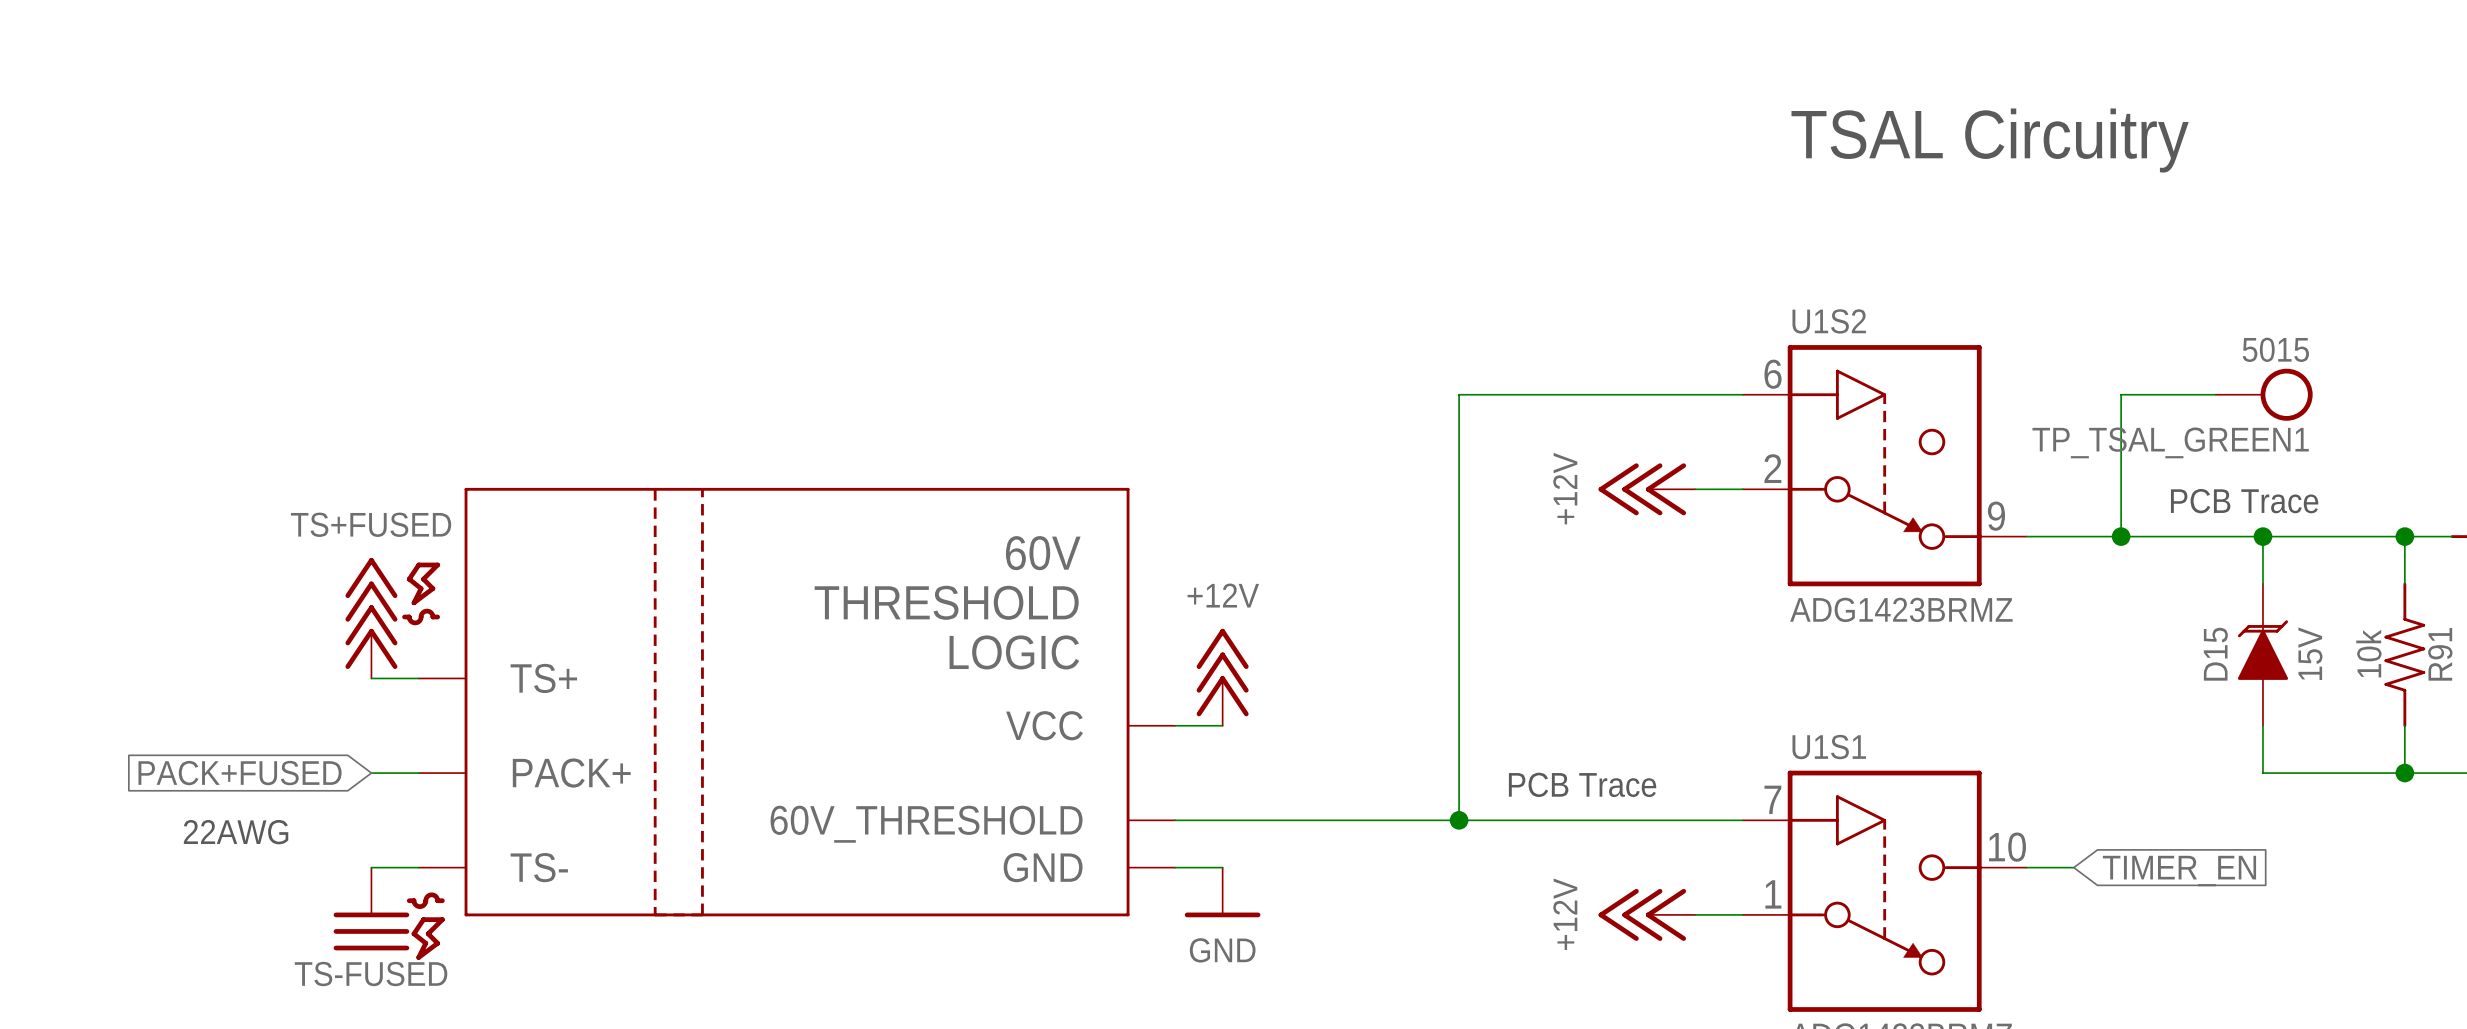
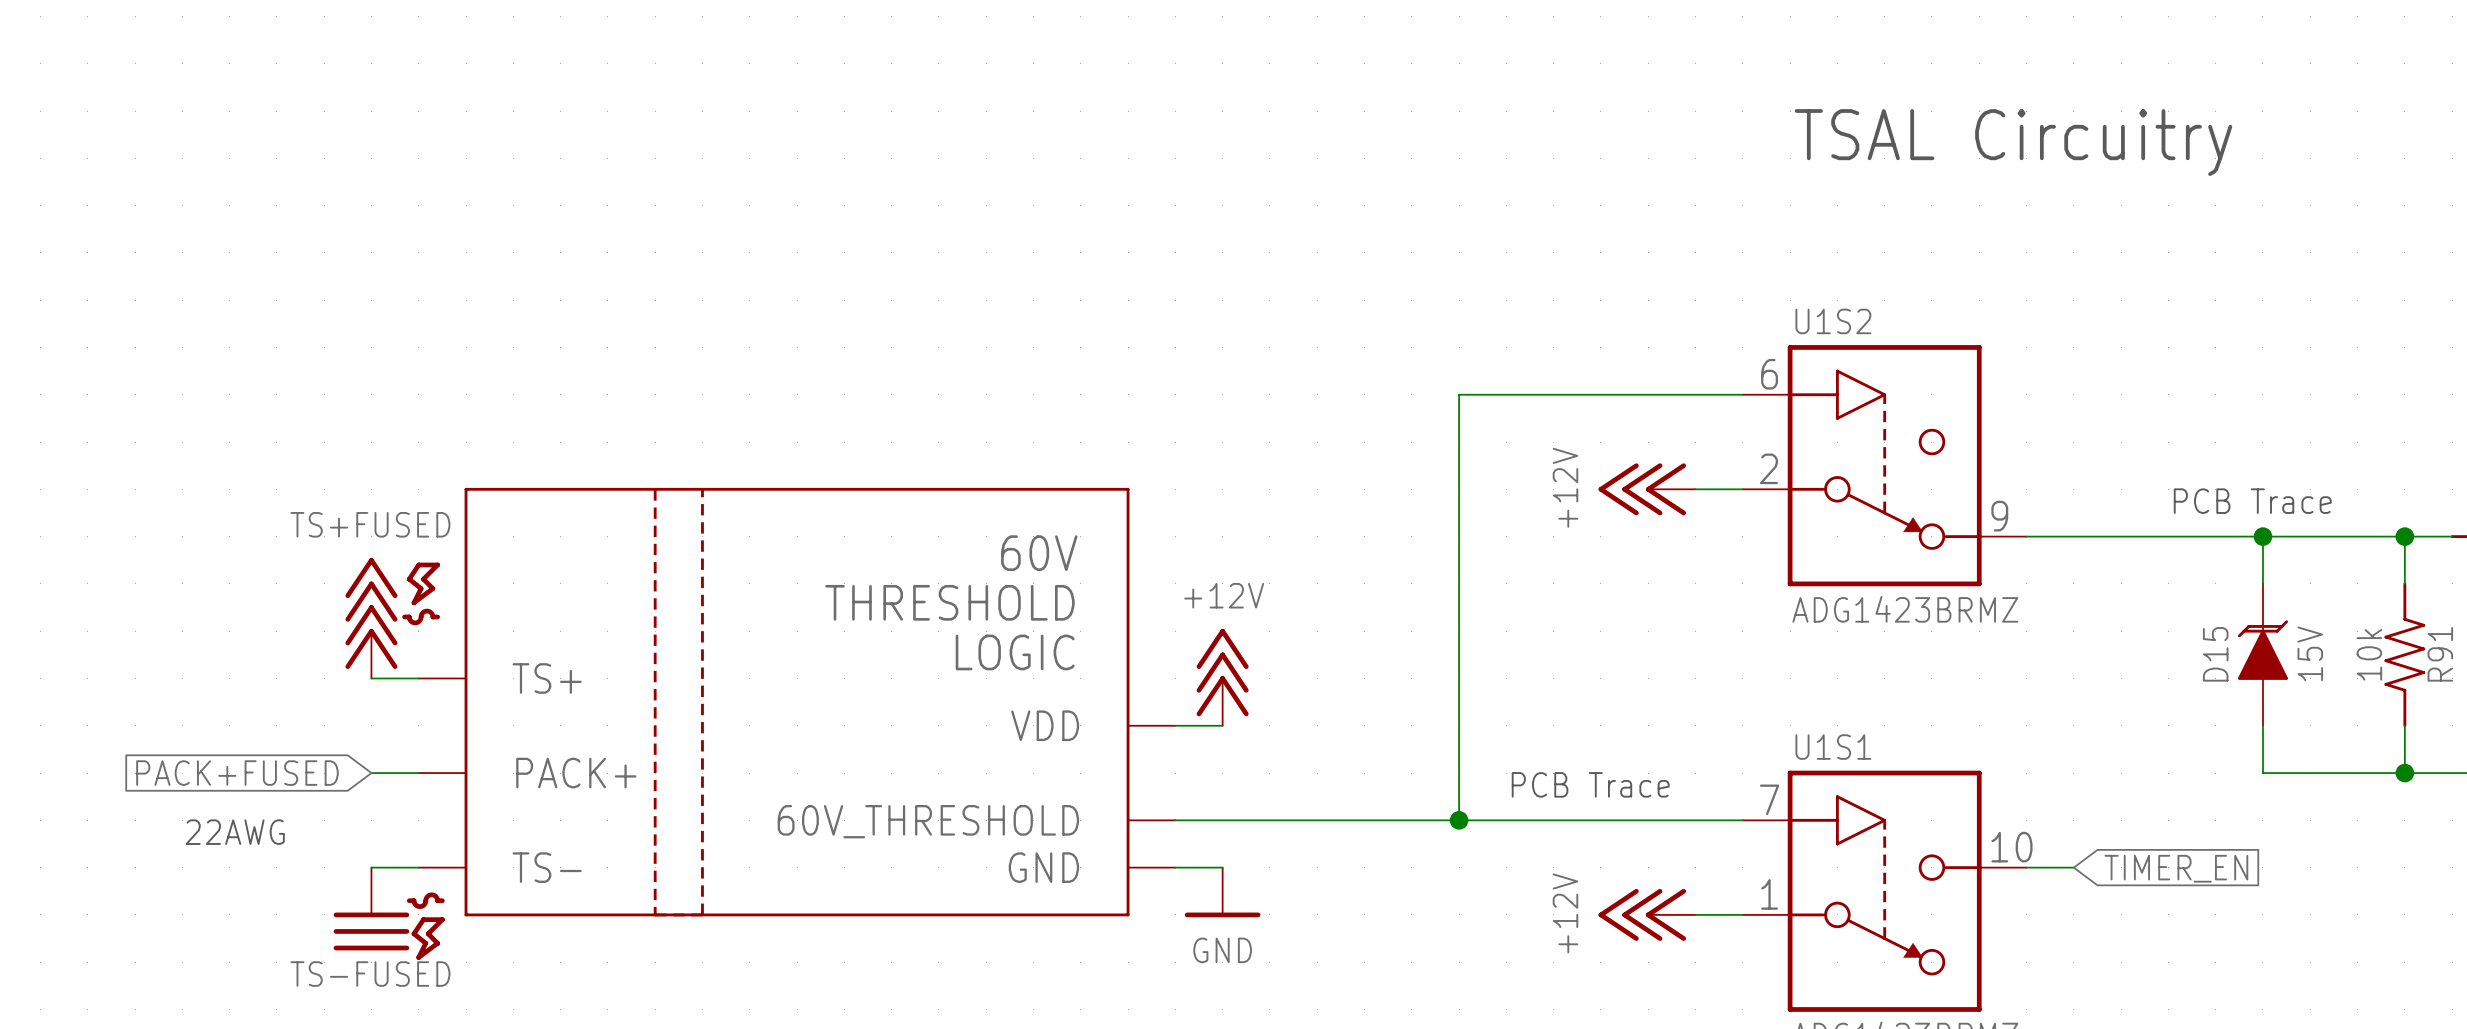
wire: (2215, 394) (2121, 394) (2121, 536) -> none
TP_TSAL_GREEN1: (2264, 394) -> none
junction: (2121, 536) -> none
part pin name: VCC (1044, 725) -> VDD (1045, 725)

